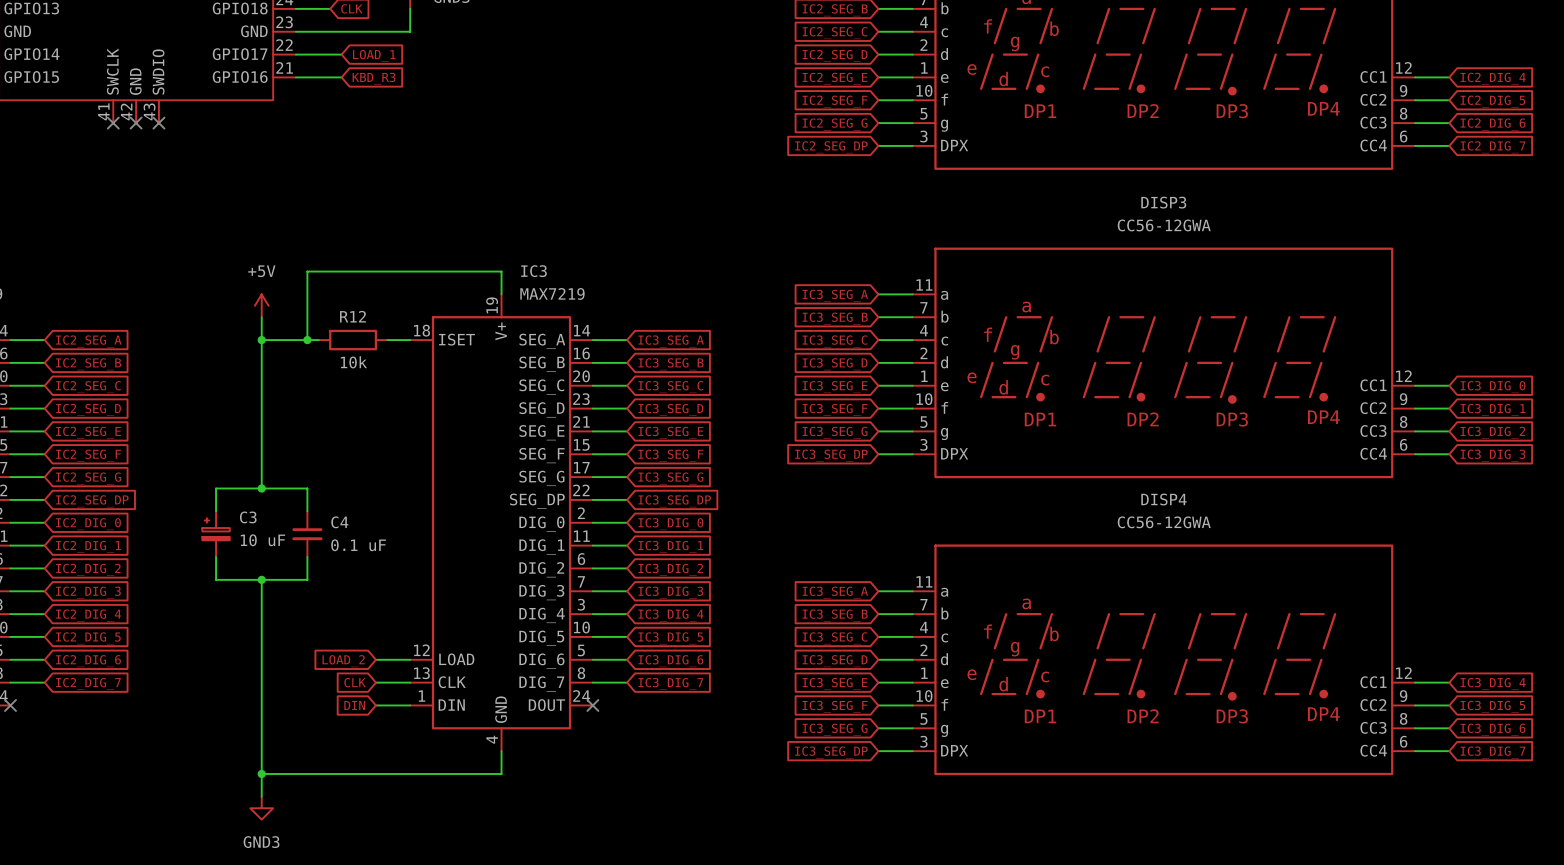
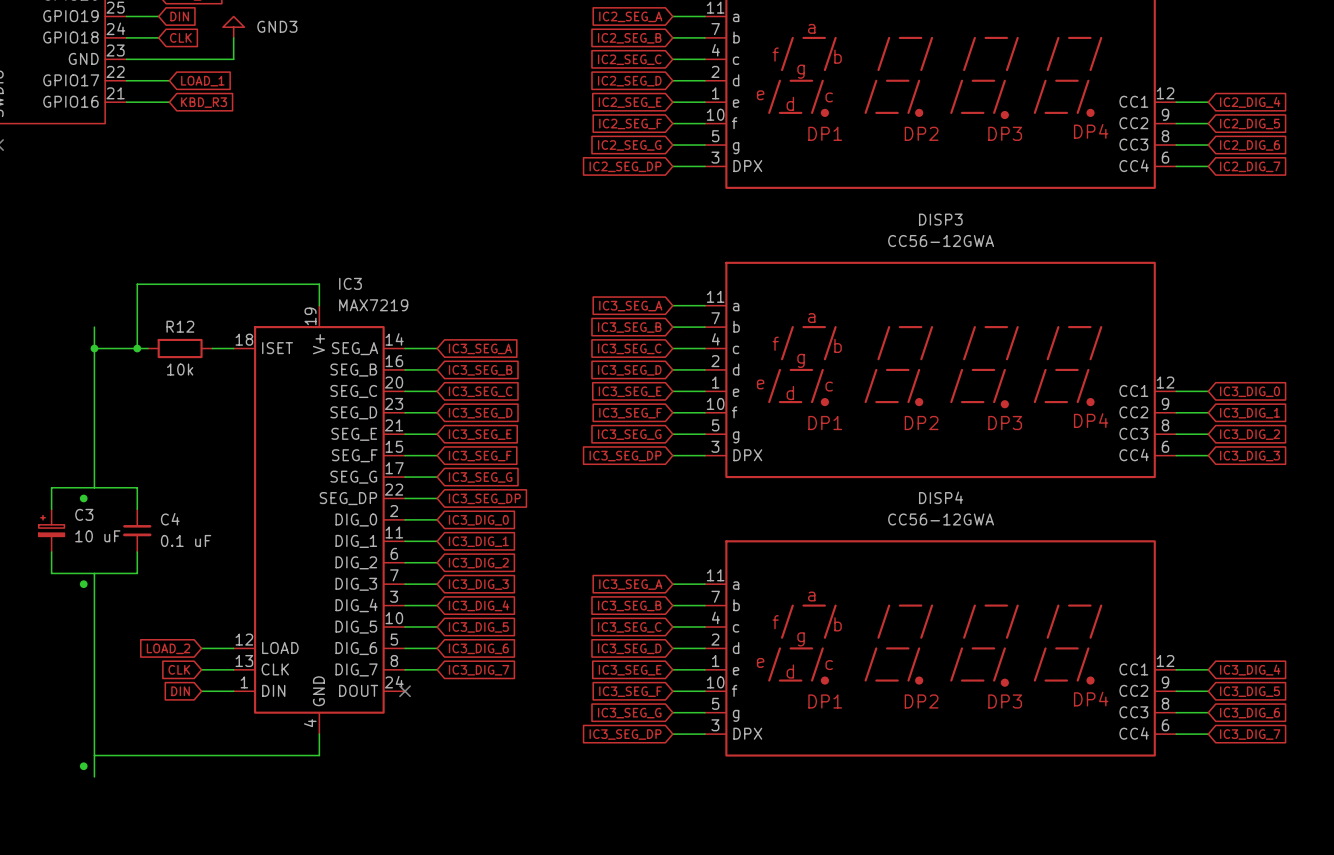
power symbol: +5V (261, 305) -> none
junction position: (261, 488) -> (83, 498)
junction position: (261, 579) -> (83, 584)
junction position: (261, 773) -> (83, 766)
power symbol: GND3 (261, 808) -> none

